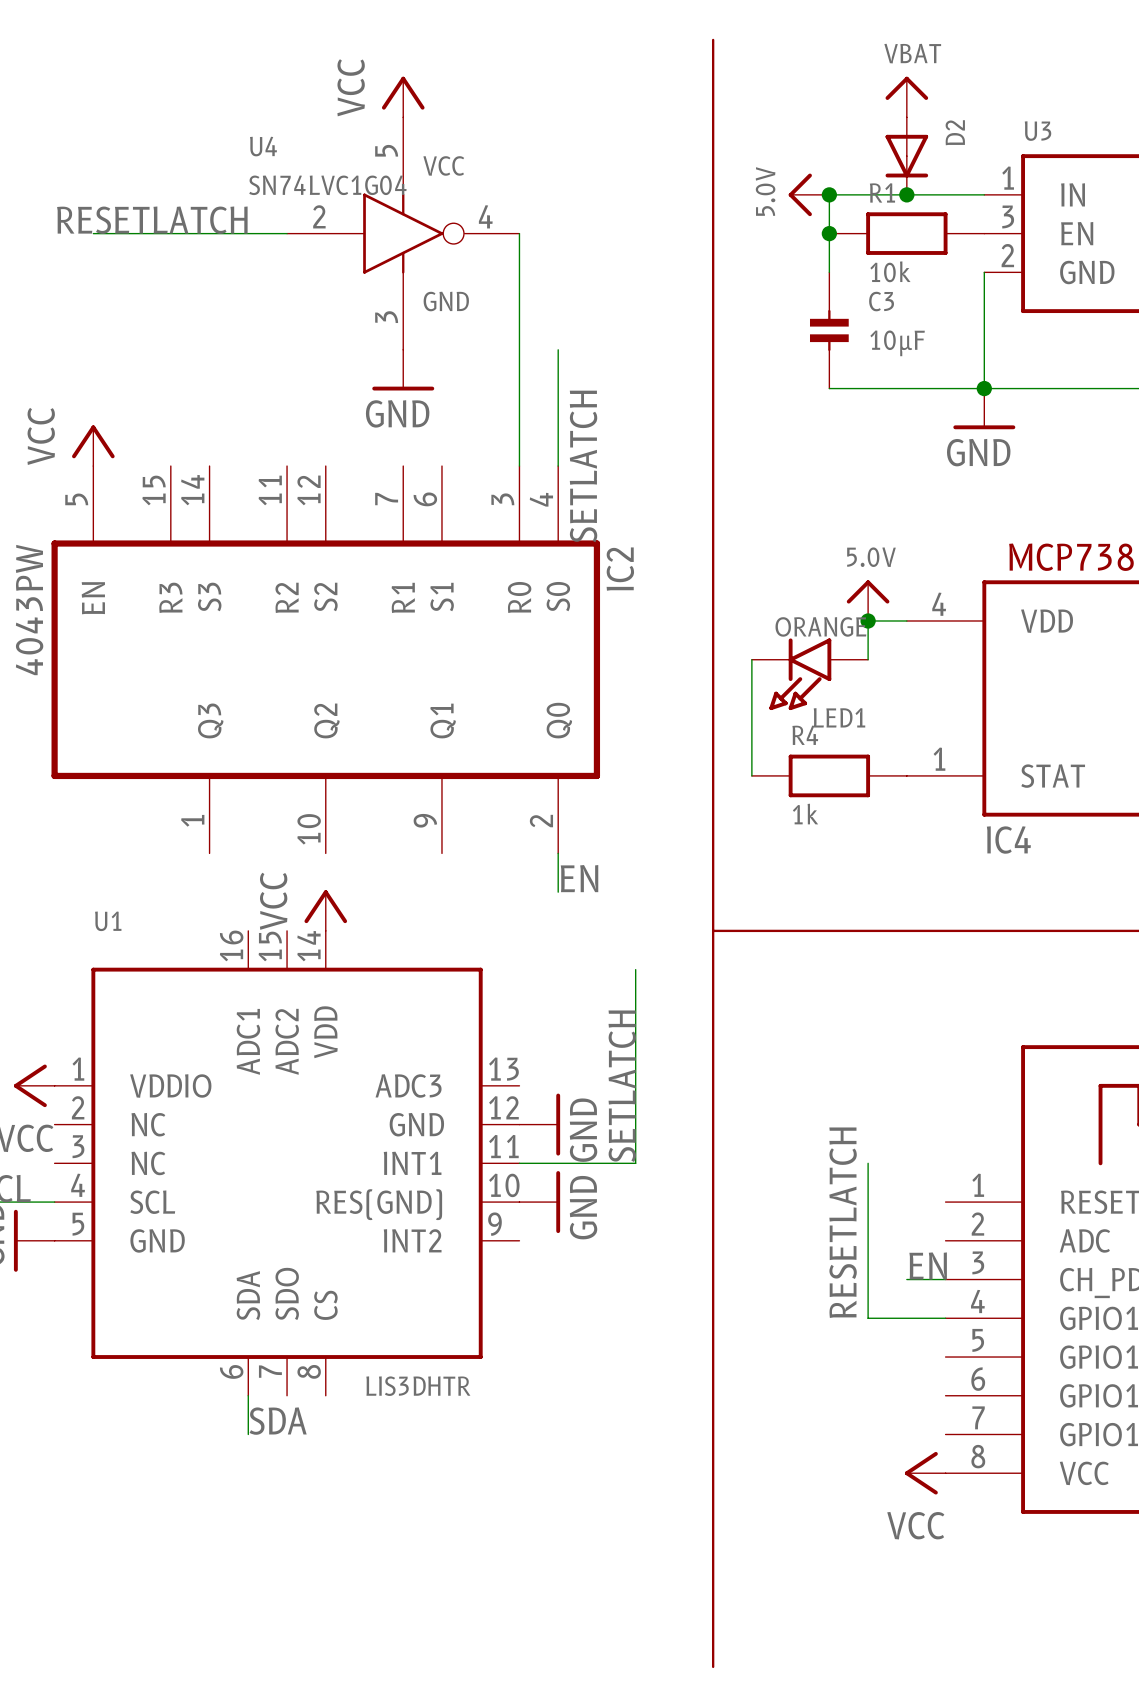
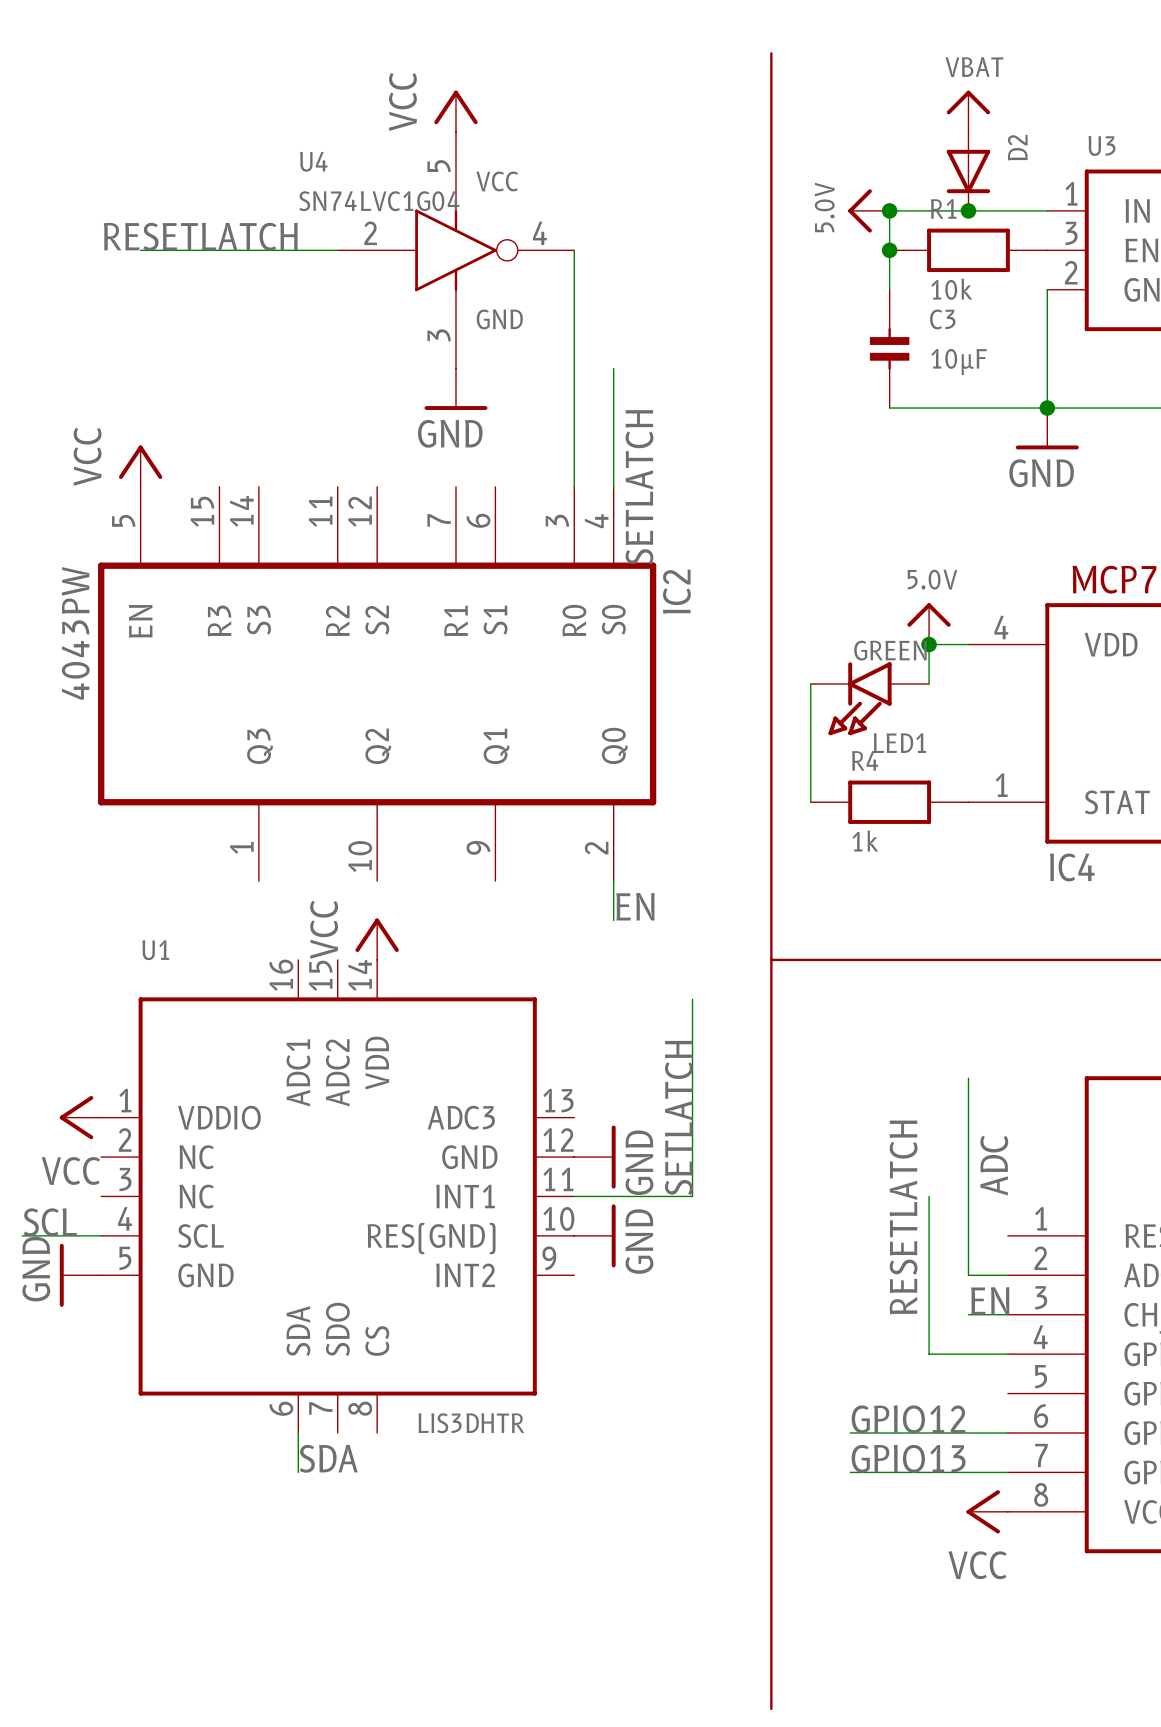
LED1 value: ORANGE (820, 626) -> GREEN (890, 650)
wire: none -> (968, 1078) (968, 1275) (1007, 1275)
label: none -> ADC (994, 1165)
label position: RESETLATCH (843, 1222) -> RESETLATCH (903, 1217)
label: none -> GPIO12 (908, 1419)
wire: none -> (850, 1432) (1007, 1432)
label: none -> GPIO13 (908, 1458)
wire: none -> (850, 1472) (1007, 1472)

